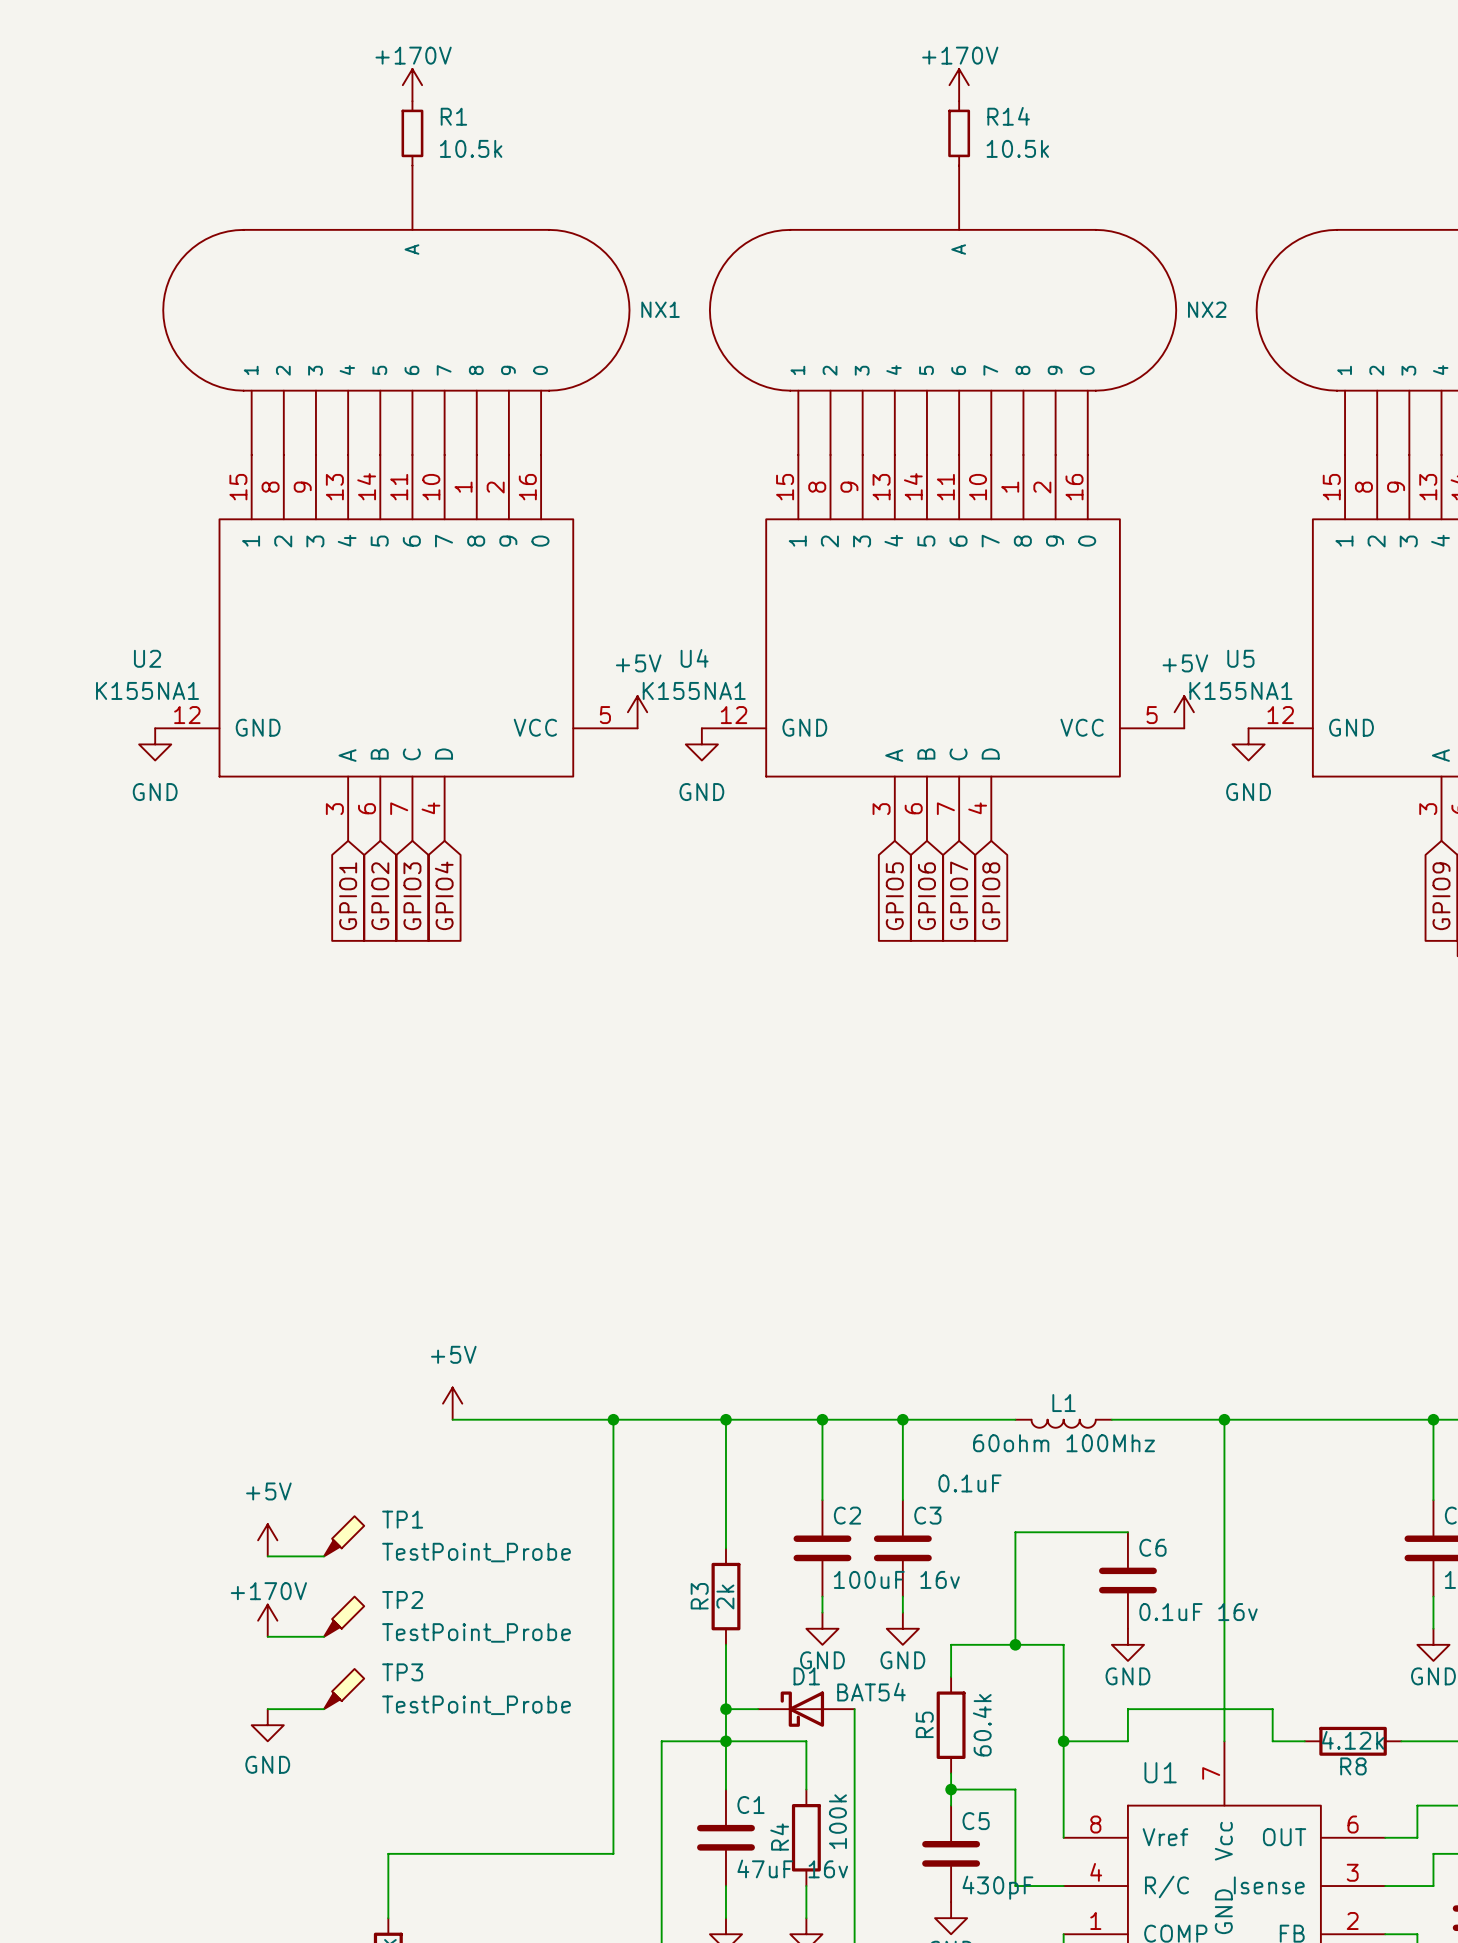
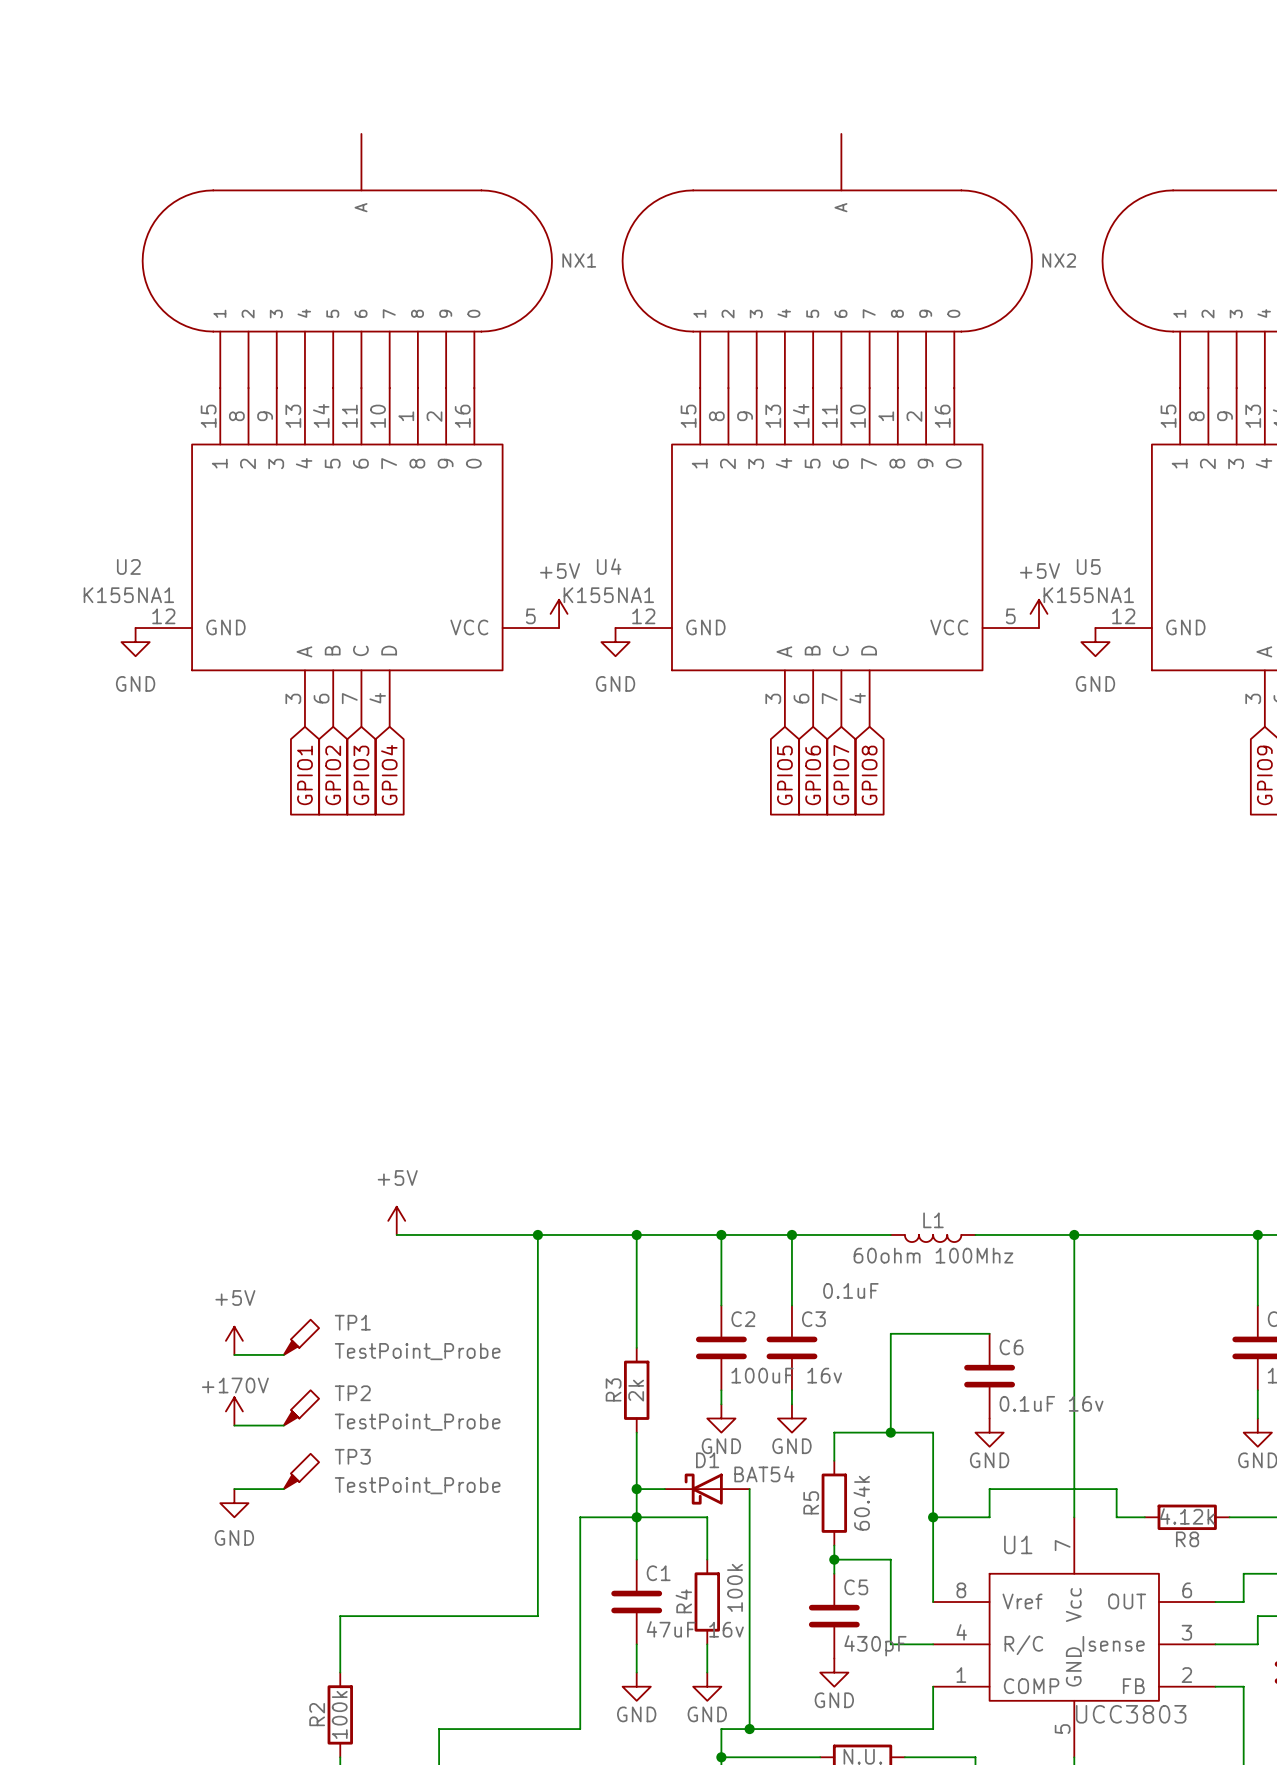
power symbol: +170V (412, 85) -> none
power symbol: +170V (959, 85) -> none
R1: 10.5k (412, 133) -> none
R14: 10.5k (959, 133) -> none

